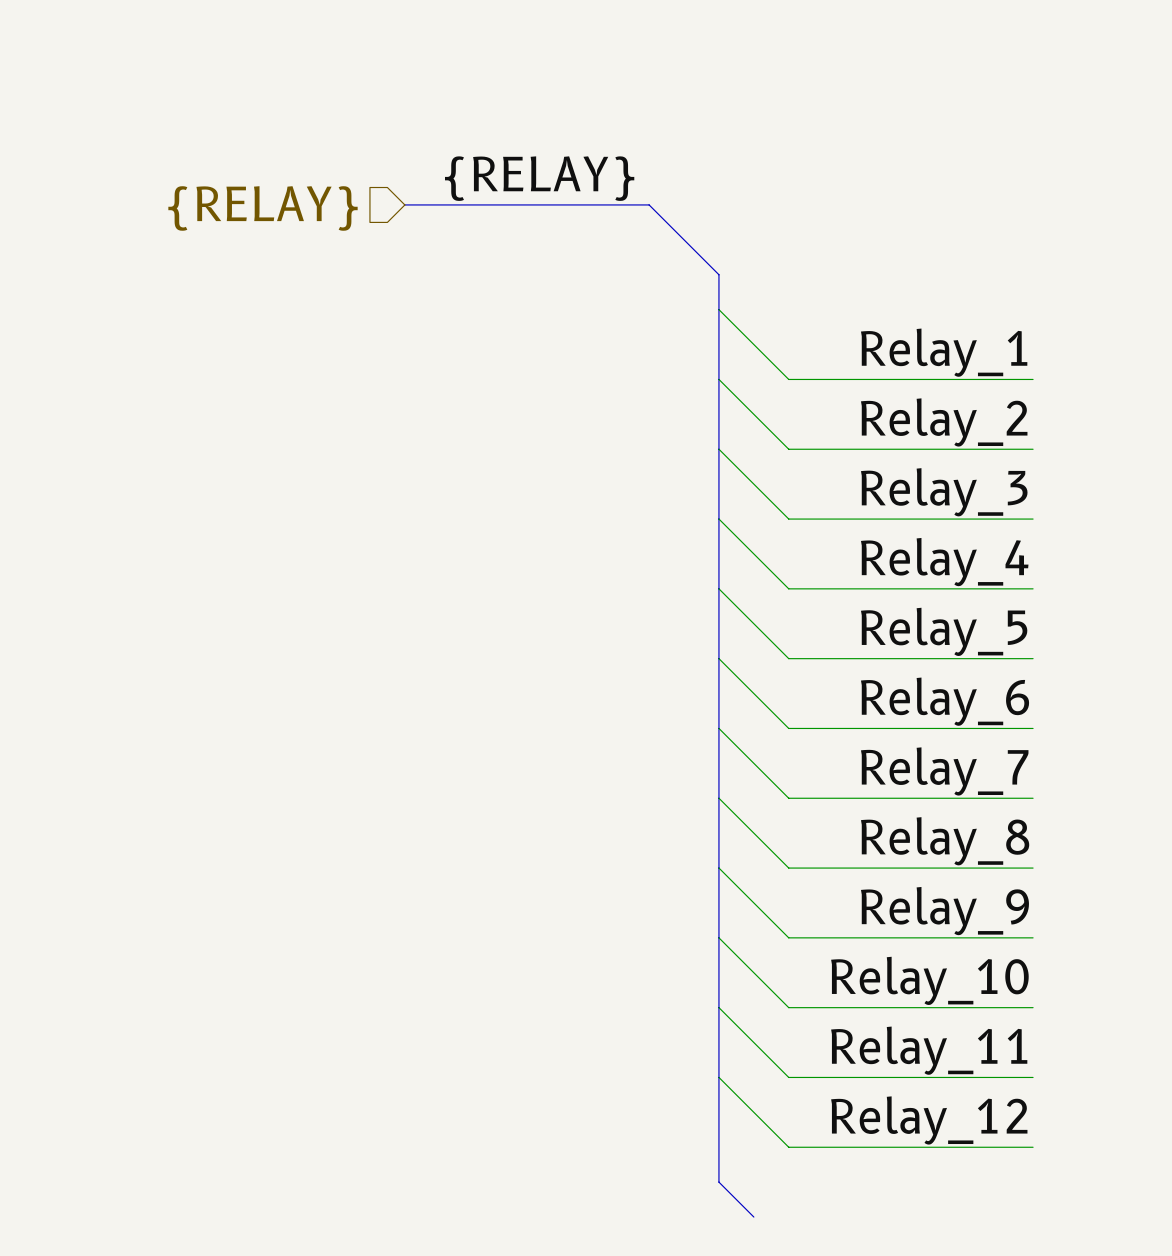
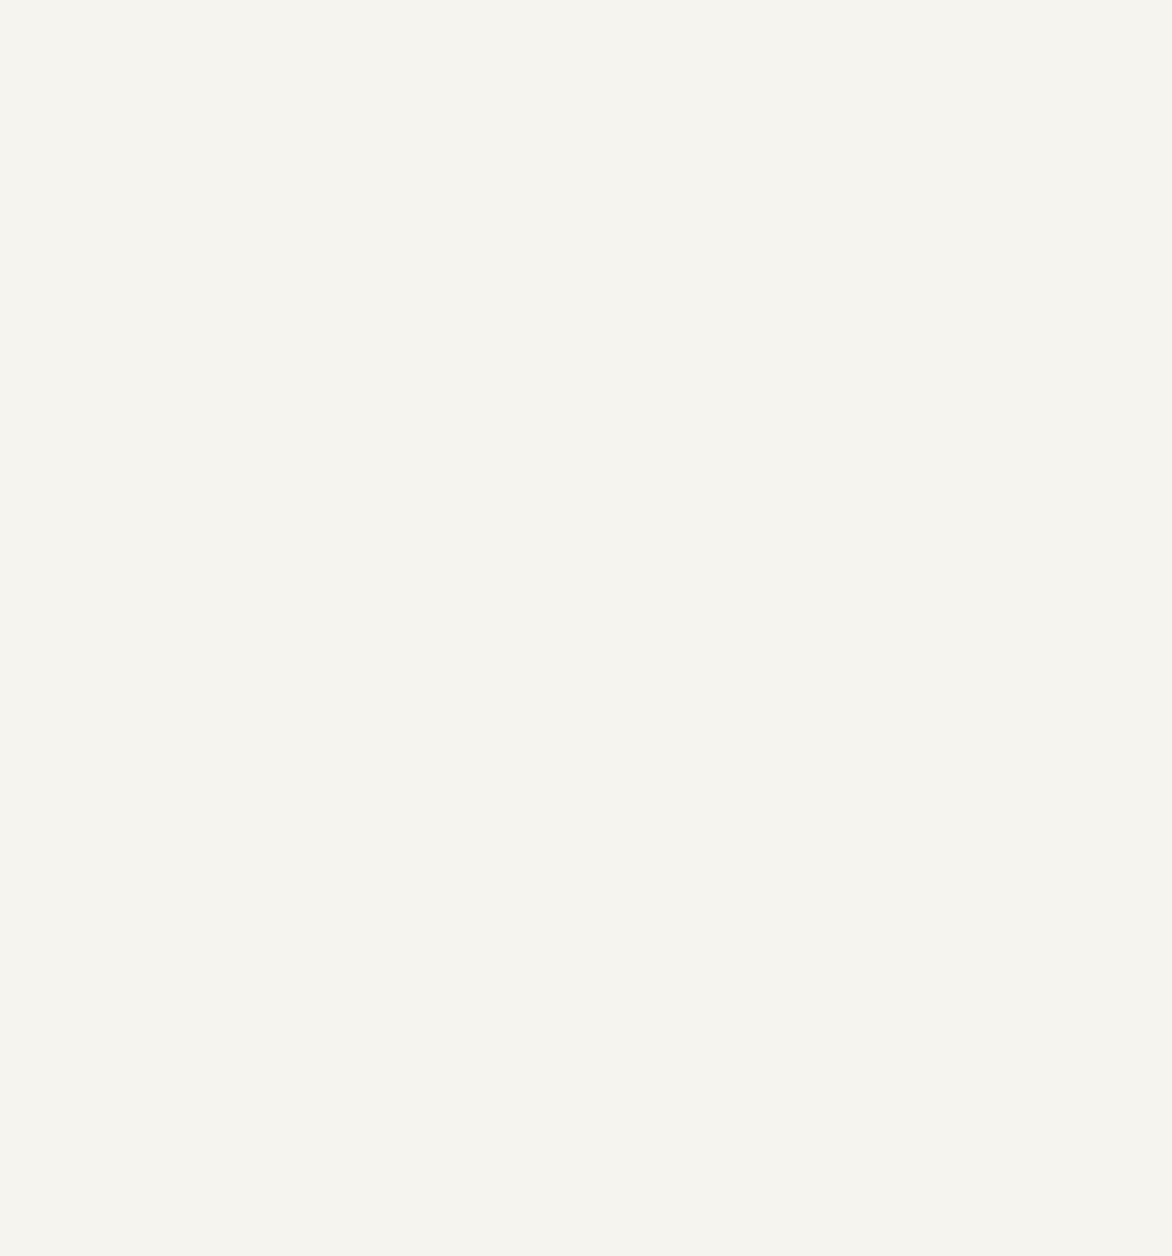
label: {RELAY} (539, 178) -> none
bus: (404, 204) (649, 204) (718, 274) (718, 1182) (753, 1217) -> none
hierarchical label: {RELAY} (263, 208) -> none
wire: (718, 309) (788, 379) (1033, 379) -> none
label: Relay_1 (944, 352) -> none
wire: (718, 379) (788, 449) (1033, 449) -> none
label: Relay_2 (944, 422) -> none
wire: (718, 449) (788, 519) (1033, 519) -> none
label: Relay_3 (944, 492) -> none
wire: (718, 519) (788, 588) (1033, 588) -> none
label: Relay_4 (944, 562) -> none
wire: (718, 588) (788, 658) (1033, 658) -> none
label: Relay_5 (944, 631) -> none
wire: (718, 658) (788, 728) (1033, 728) -> none
label: Relay_6 (945, 701) -> none
wire: (718, 728) (788, 798) (1033, 798) -> none
label: Relay_7 (944, 771) -> none
wire: (718, 798) (788, 868) (1033, 868) -> none
label: Relay_8 (945, 841) -> none
wire: (718, 868) (788, 937) (1033, 937) -> none
label: Relay_9 (944, 911) -> none
wire: (718, 937) (788, 1007) (1033, 1007) -> none
label: Relay_10 (929, 980) -> none
wire: (718, 1007) (788, 1077) (1033, 1077) -> none
label: Relay_11 (929, 1050) -> none
wire: (718, 1077) (788, 1147) (1033, 1147) -> none
label: Relay_12 (929, 1120) -> none

